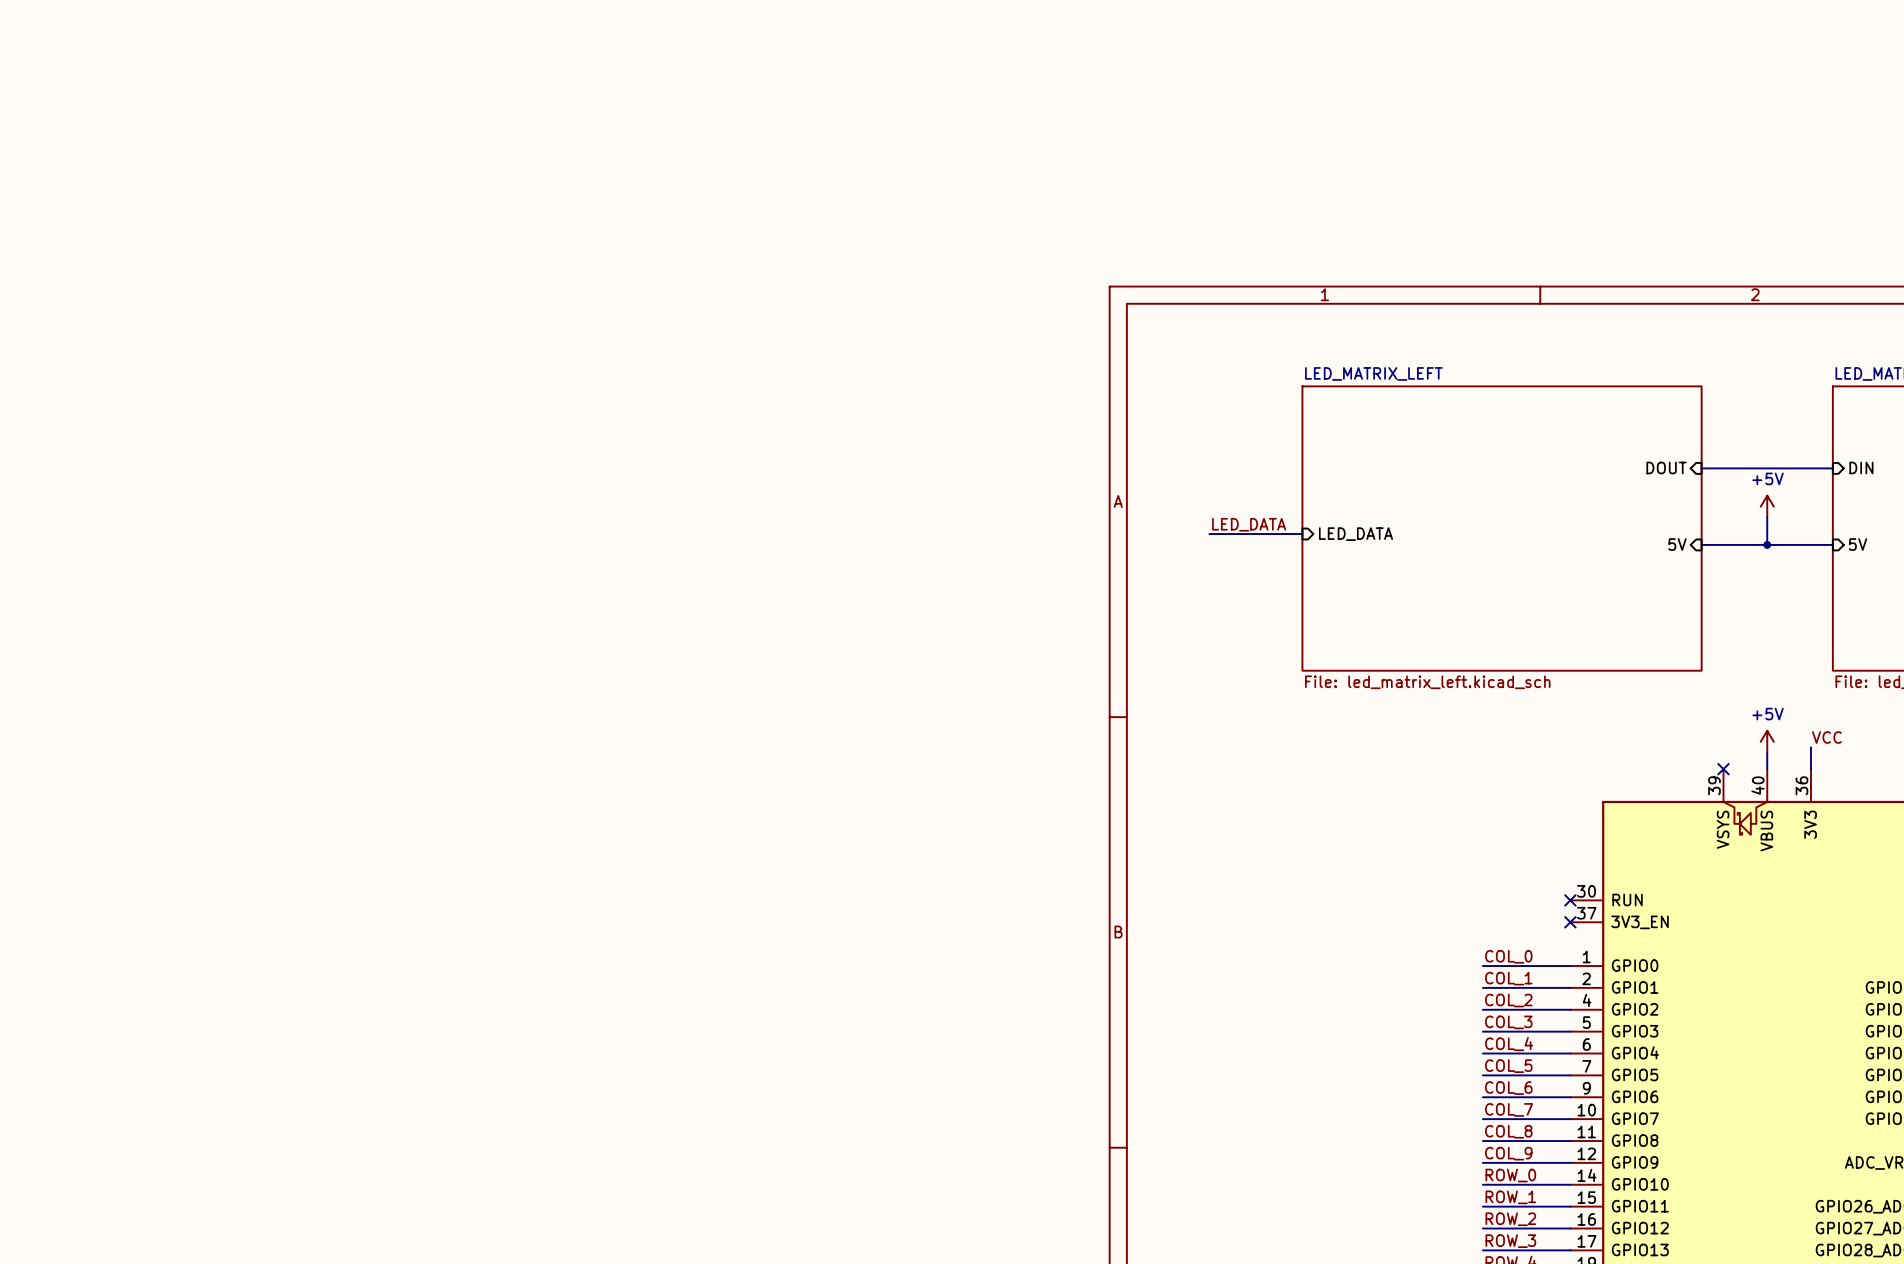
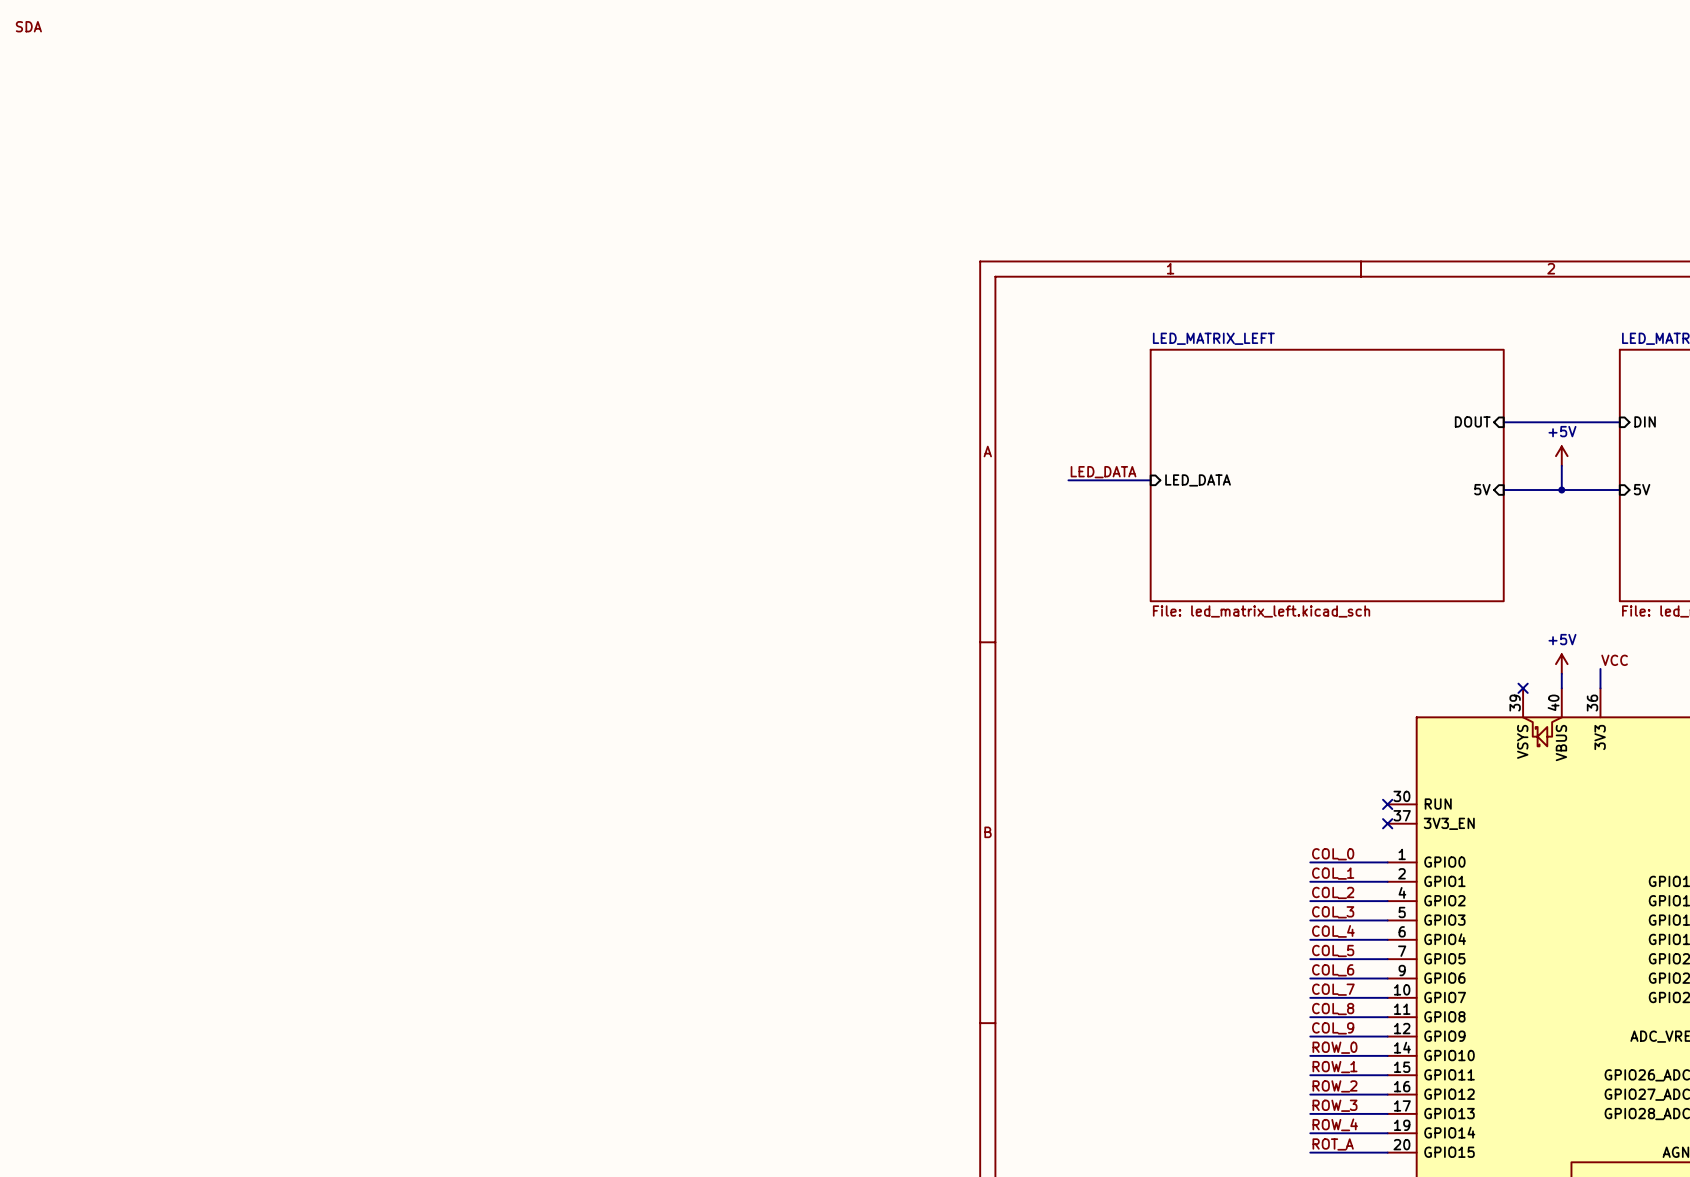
label: none -> SDA (28, 26)

